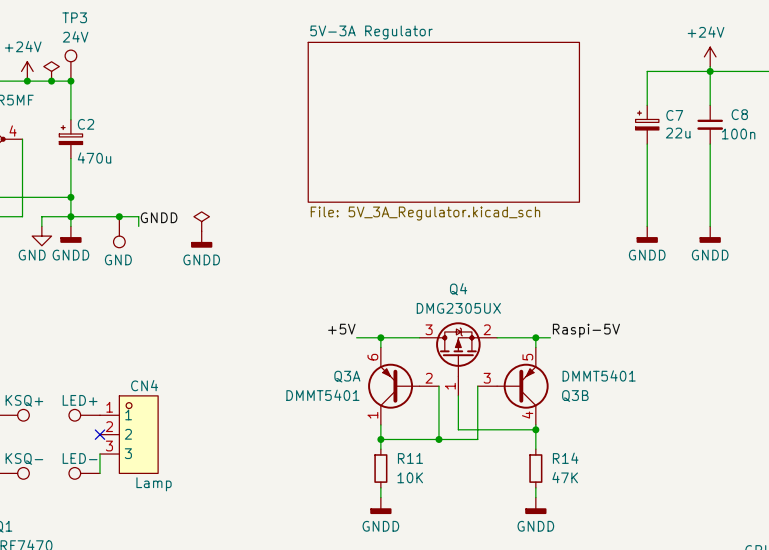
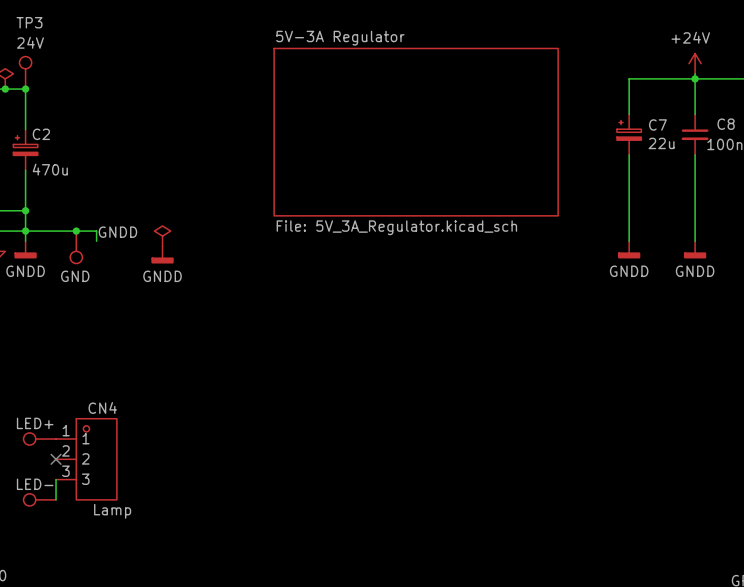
label: +5V (341, 329) -> none
label: Raspi-5V (586, 330) -> none
wire: (356, 337) (419, 337) -> none
wire: (380, 337) (380, 347) -> none
junction: (380, 337) -> none
wire: (497, 337) (550, 337) -> none
wire: (535, 337) (535, 347) -> none
junction: (535, 337) -> none
Q4: DMG2305UX (458, 359) -> none
Q3A: DMMT5401 (403, 386) -> none
wire: (438, 386) (438, 439) -> none
wire: (477, 386) (477, 439) (380, 439) -> none
Q3B: DMMT5401 (513, 386) -> none
wire: (458, 395) (458, 429) (535, 429) -> none
wire: (380, 424) (380, 449) -> none
wire: (535, 424) (535, 449) -> none
junction: (535, 429) -> none
junction: (380, 439) -> none
junction: (438, 439) -> none
R11: 10K (380, 468) -> none
R14: 47K (535, 468) -> none
wire: (380, 487) (380, 497) -> none
wire: (535, 487) (535, 497) -> none
power symbol: GNDD (380, 505) -> none
power symbol: GNDD (535, 505) -> none

